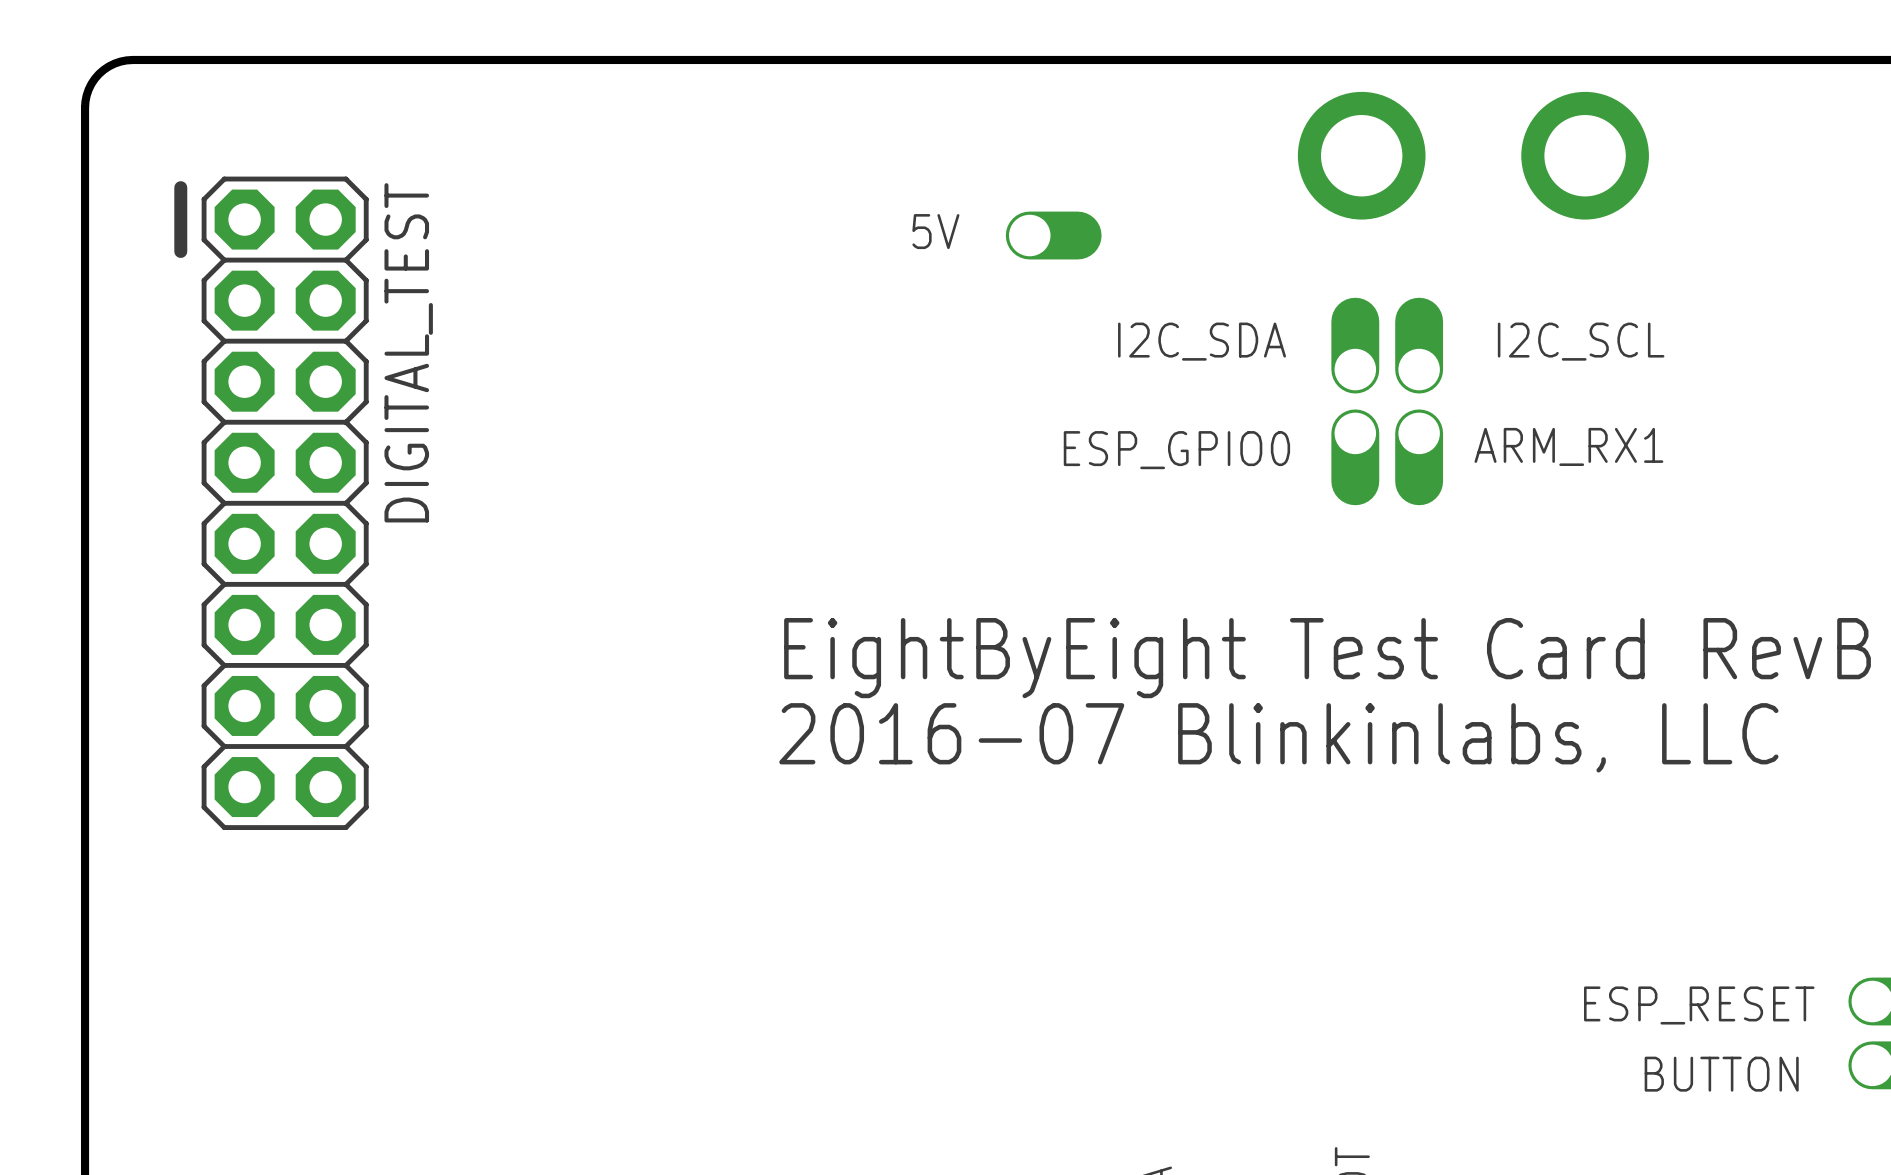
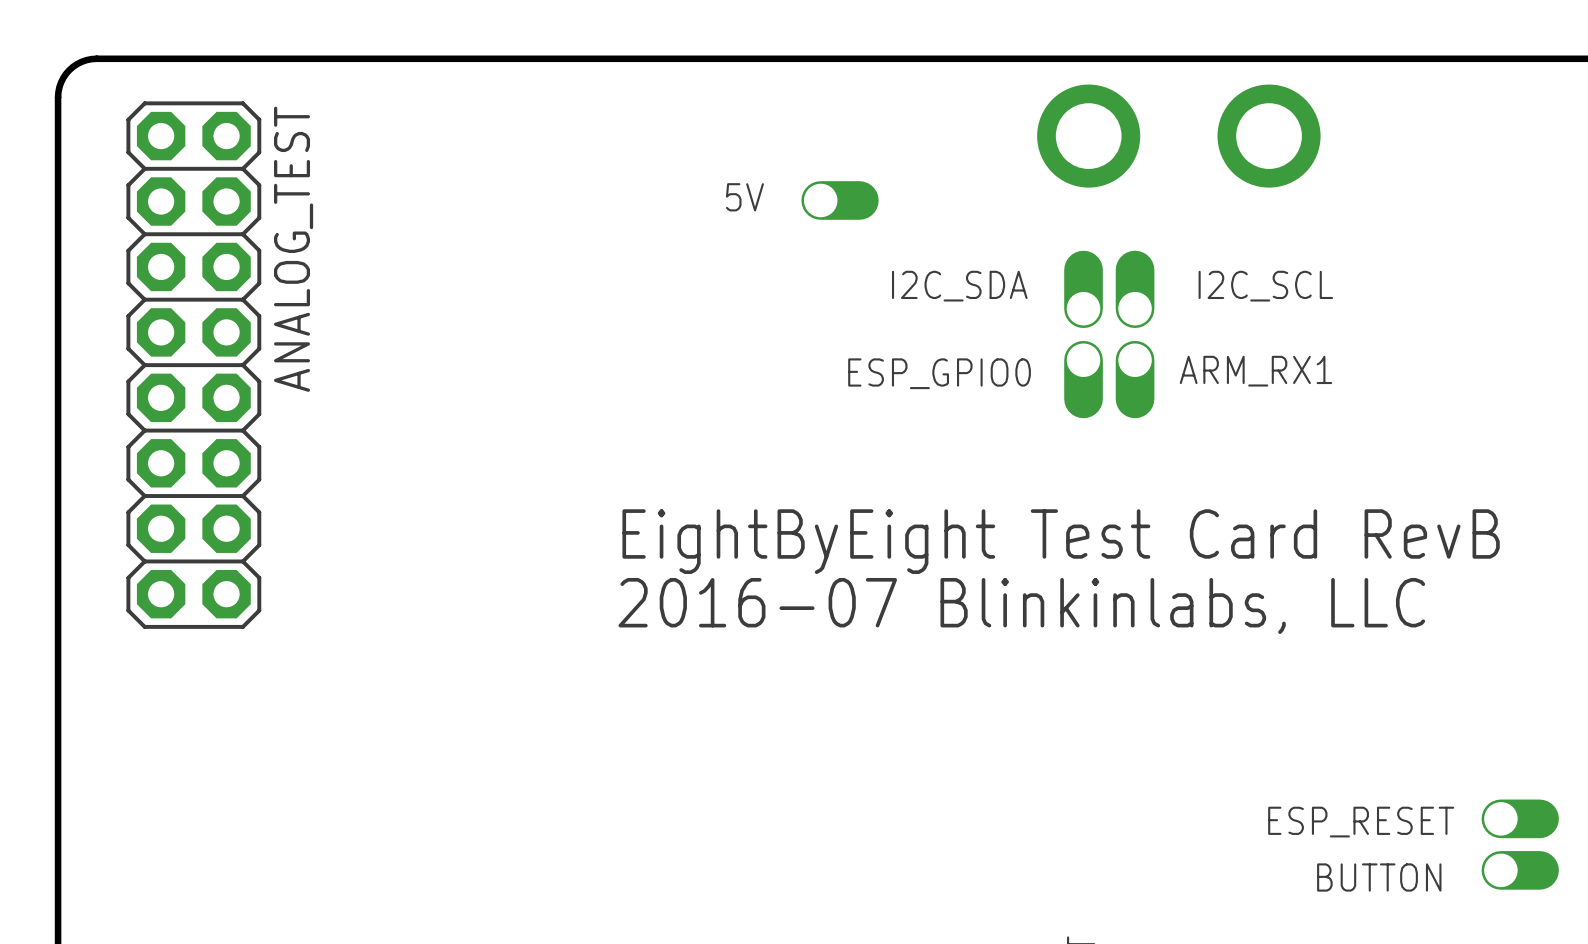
line: (180, 187) (180, 251) -> none
ANALOG_TEST: none -> (193, 365)
DIGITAL_TEST: (285, 503) -> none

